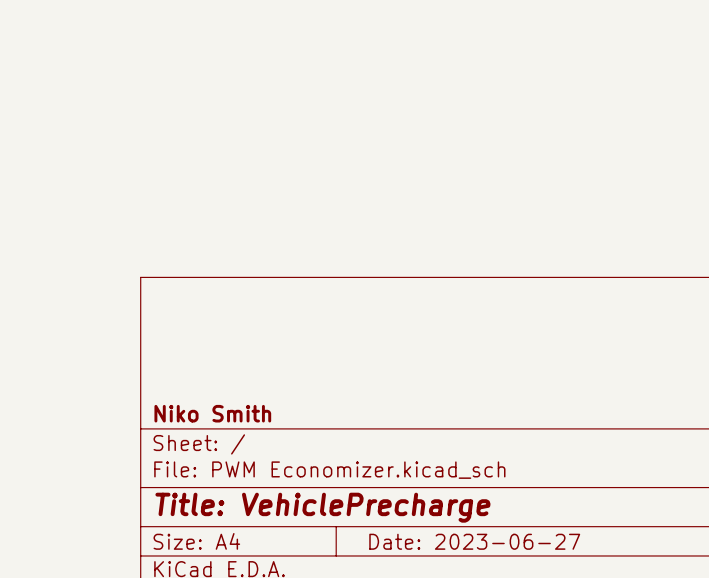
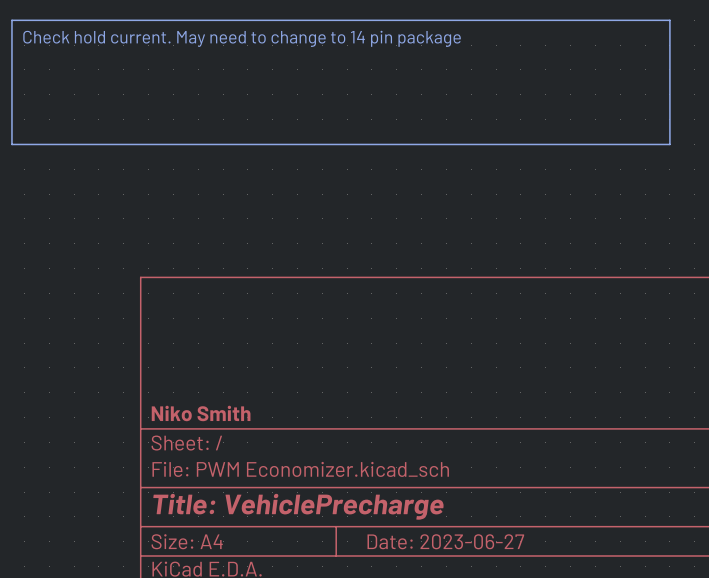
line: none -> (11, 20) (669, 20) (669, 144) (11, 144) (11, 20)
text: none -> Check hold current. May need to change to 14 pin package (242, 38)

